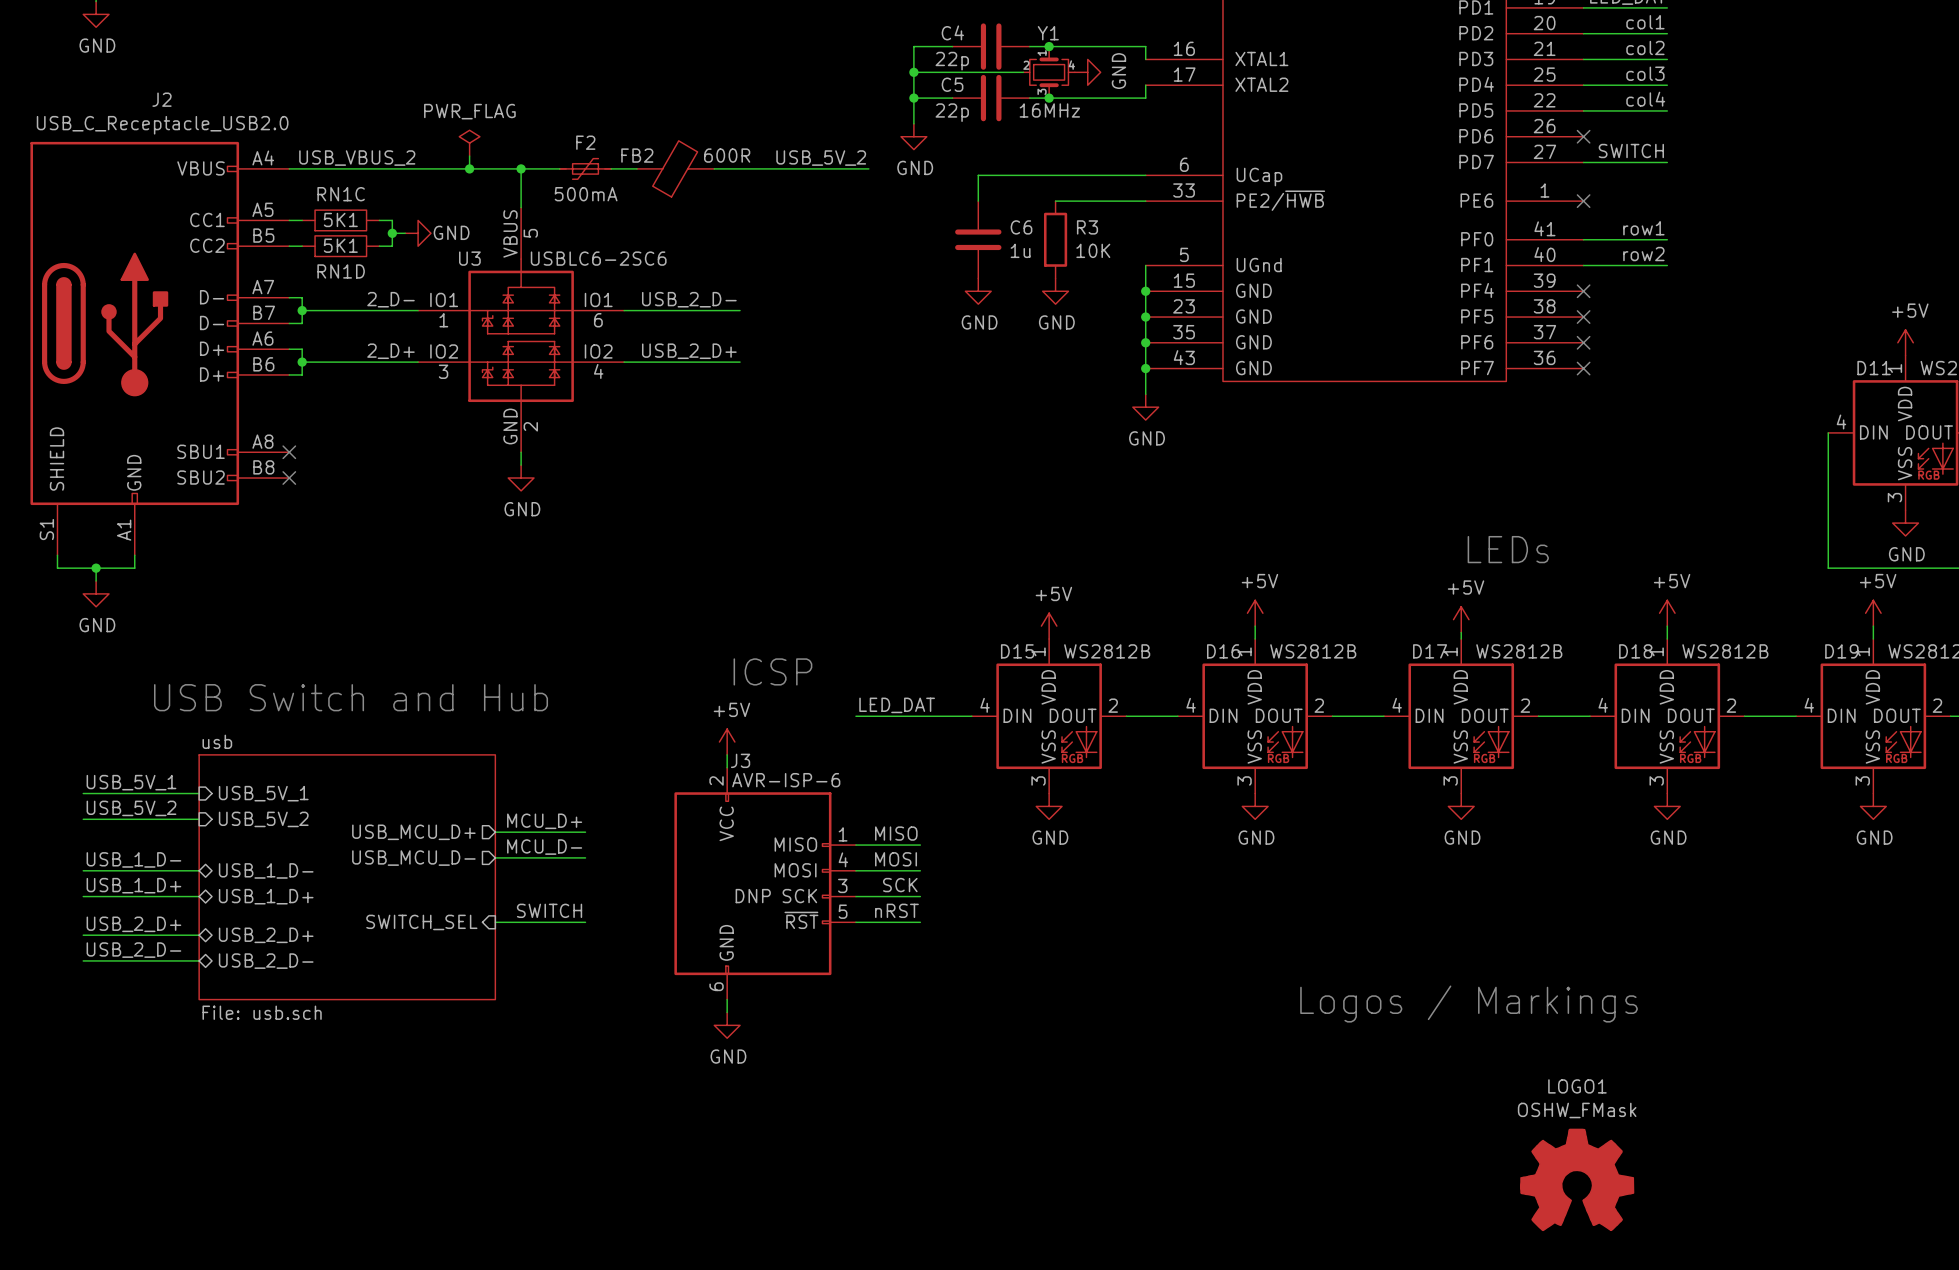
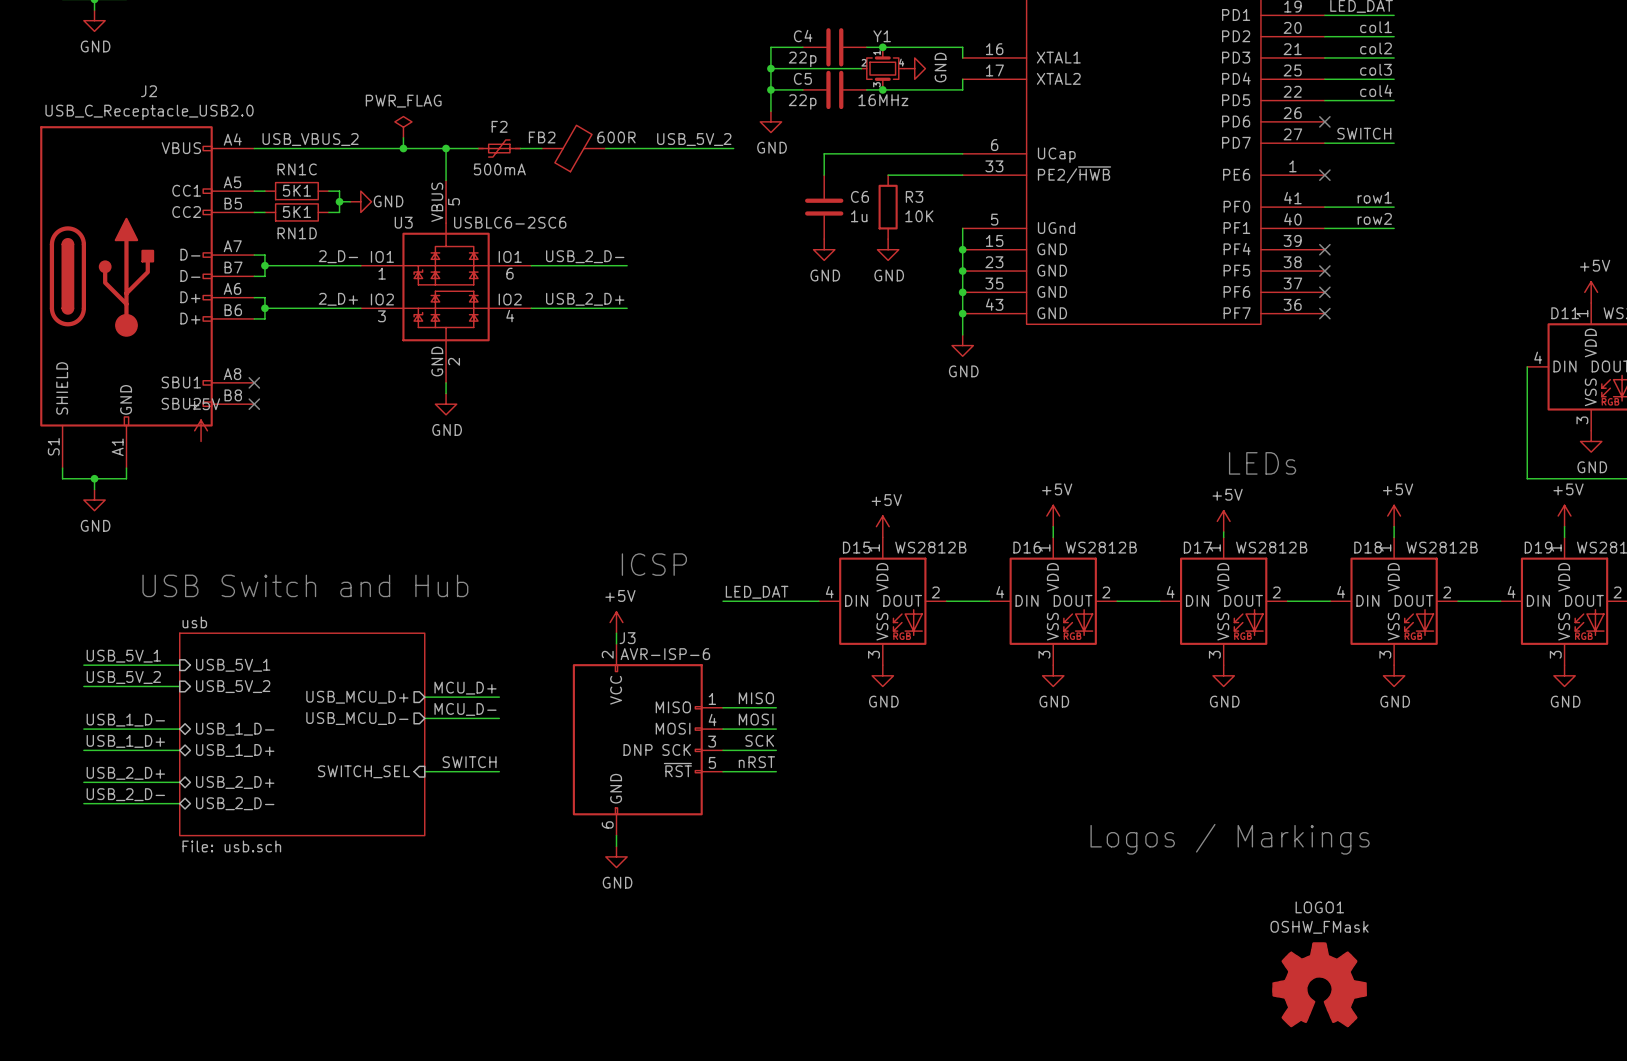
power symbol: none -> +5V (201, 430)

